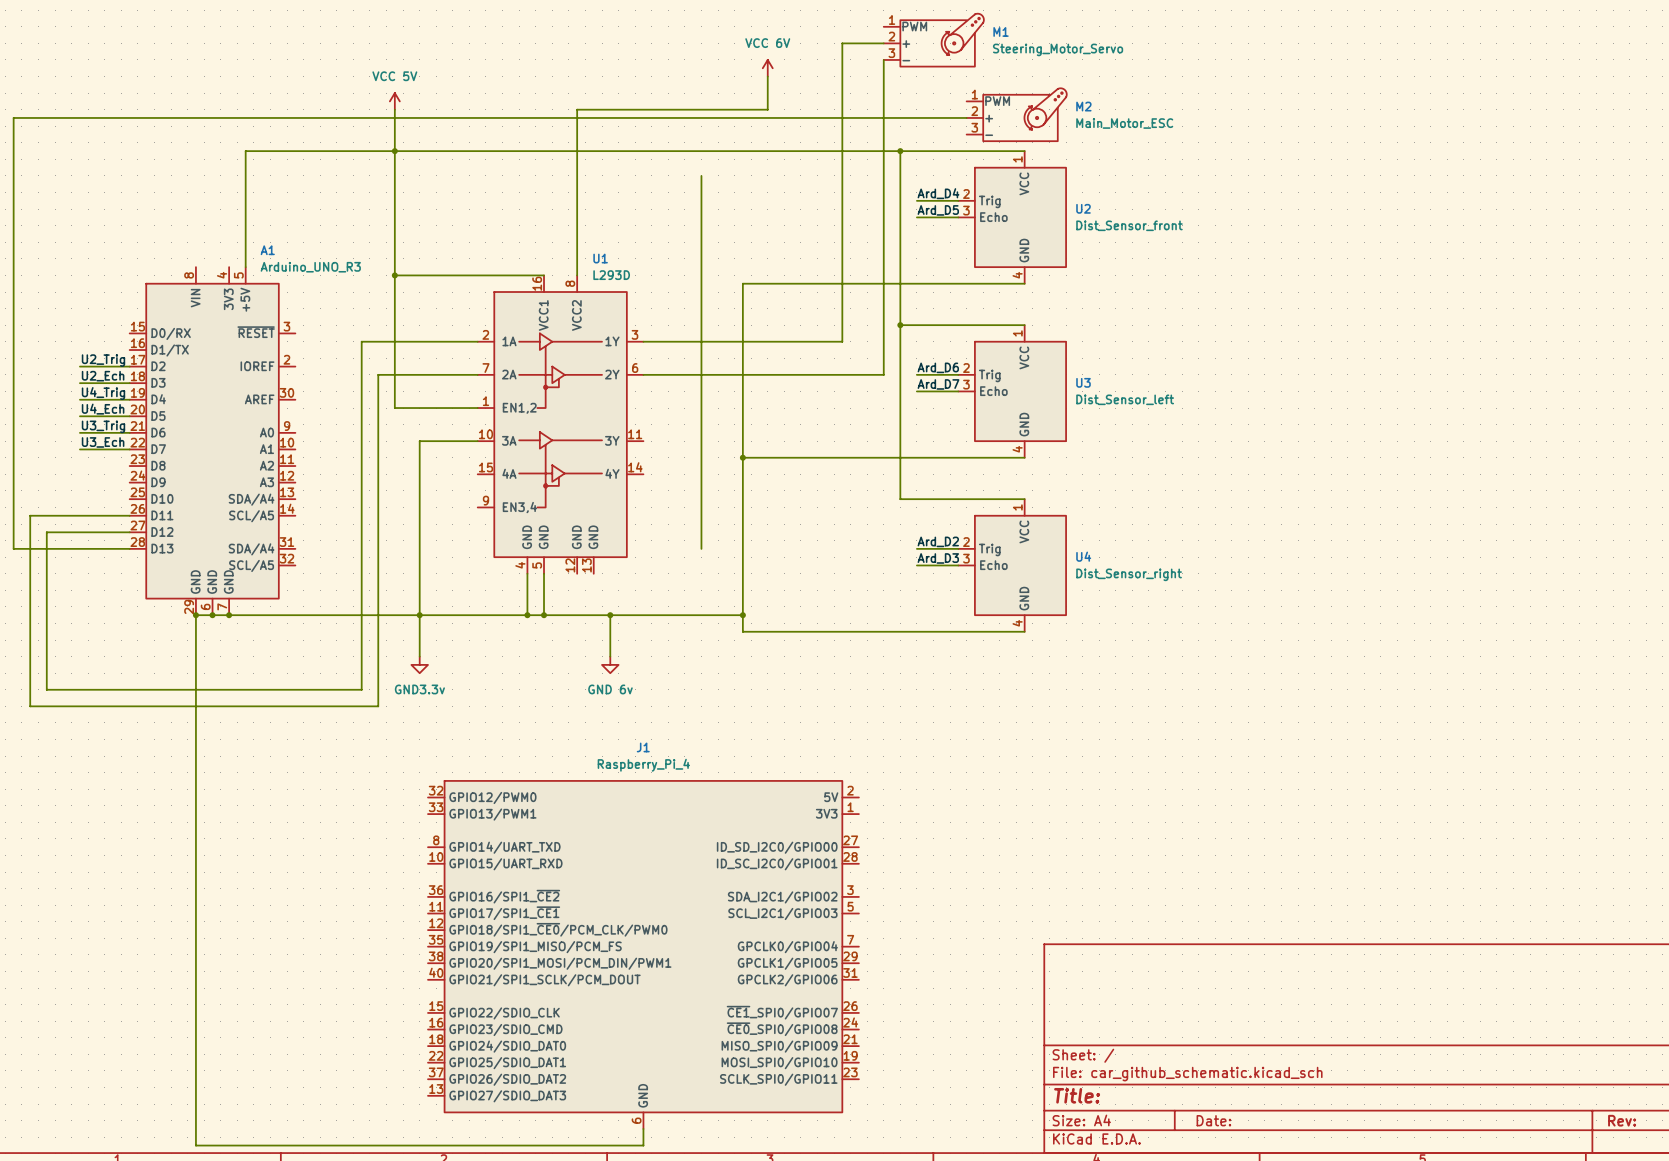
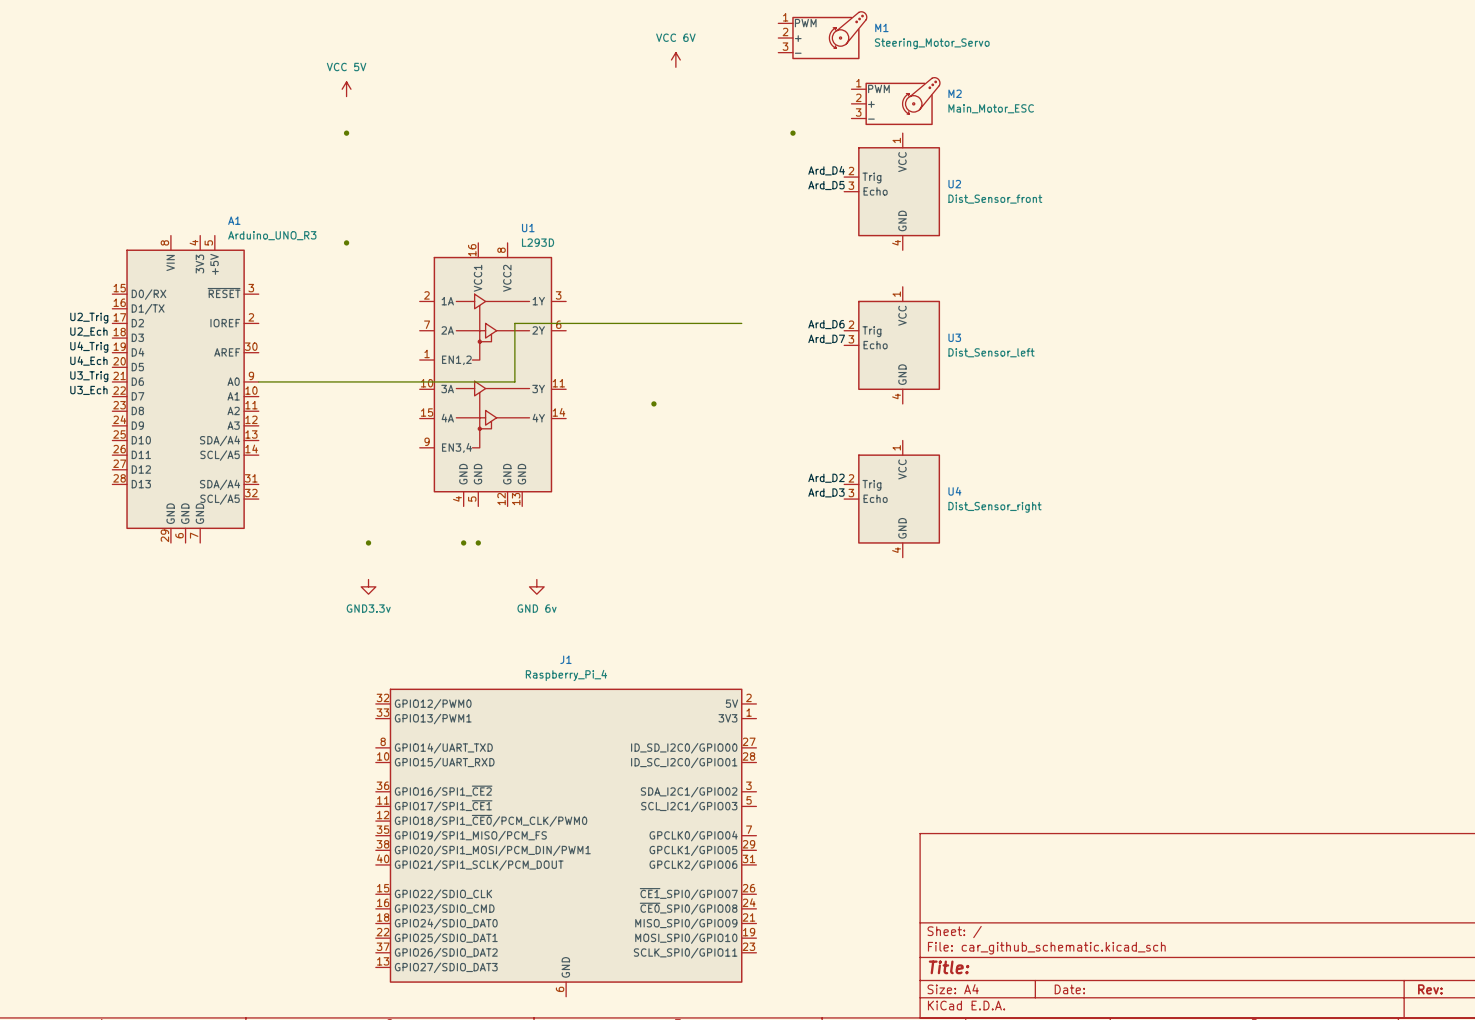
wire: (883, 43) (842, 43) (842, 341) (643, 341) -> none
wire: (883, 59) (883, 374) (643, 374) -> none
wire: (767, 76) (767, 109) (577, 109) (577, 275) -> none
wire: (394, 109) (394, 408) (477, 408) -> none
wire: (966, 117) (13, 117) (13, 548) (129, 548) -> none
wire: (900, 151) (900, 499) (1024, 499) -> none
wire: (1024, 151) (245, 151) (245, 267) -> none
wire: (701, 175) (701, 548) -> none
wire: (916, 200) (958, 200) -> none
wire: (916, 217) (958, 217) -> none
wire: (394, 275) (544, 275) -> none
wire: (1024, 283) (742, 283) (742, 631) (1024, 631) -> none
wire: (900, 325) (1024, 325) -> none
junction: (900, 325) -> none
wire: (477, 341) (361, 341) (361, 689) (46, 689) (46, 532) (129, 532) -> none
wire: (79, 366) (129, 366) -> none
wire: none -> (741, 323) (514, 323) (514, 381) (258, 381)
wire: (477, 374) (378, 374) (378, 706) (30, 706) (30, 515) (129, 515) -> none
wire: (916, 374) (958, 374) -> none
wire: (79, 383) (129, 383) -> none
wire: (916, 391) (958, 391) -> none
wire: (79, 399) (129, 399) -> none
wire: (79, 416) (129, 416) -> none
wire: (79, 432) (129, 432) -> none
wire: (477, 441) (419, 441) (419, 656) -> none
wire: (79, 449) (129, 449) -> none
wire: (742, 457) (1024, 457) -> none
wire: (916, 548) (958, 548) -> none
wire: (916, 565) (958, 565) -> none
wire: (527, 573) (527, 615) -> none
wire: (544, 573) (544, 615) -> none
junction: (195, 615) -> none
junction: (212, 615) -> none
junction: (229, 615) -> none
wire: (610, 615) (610, 656) -> none
junction: (610, 615) -> none
wire: (742, 615) (195, 615) (195, 1145) (643, 1145) (643, 1128) -> none
junction: (742, 615) -> none

